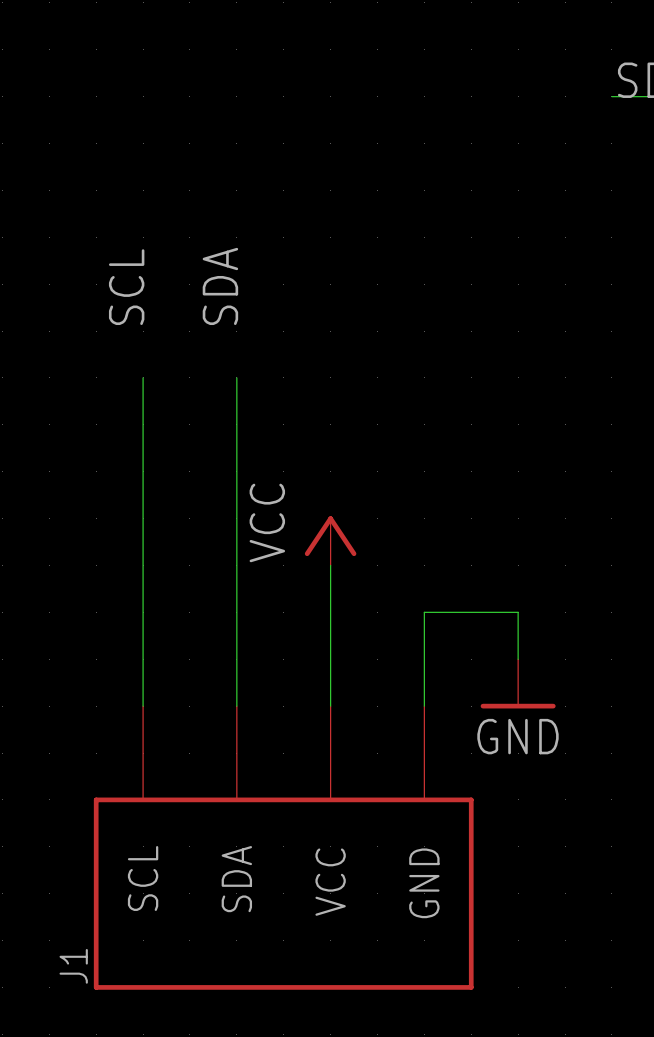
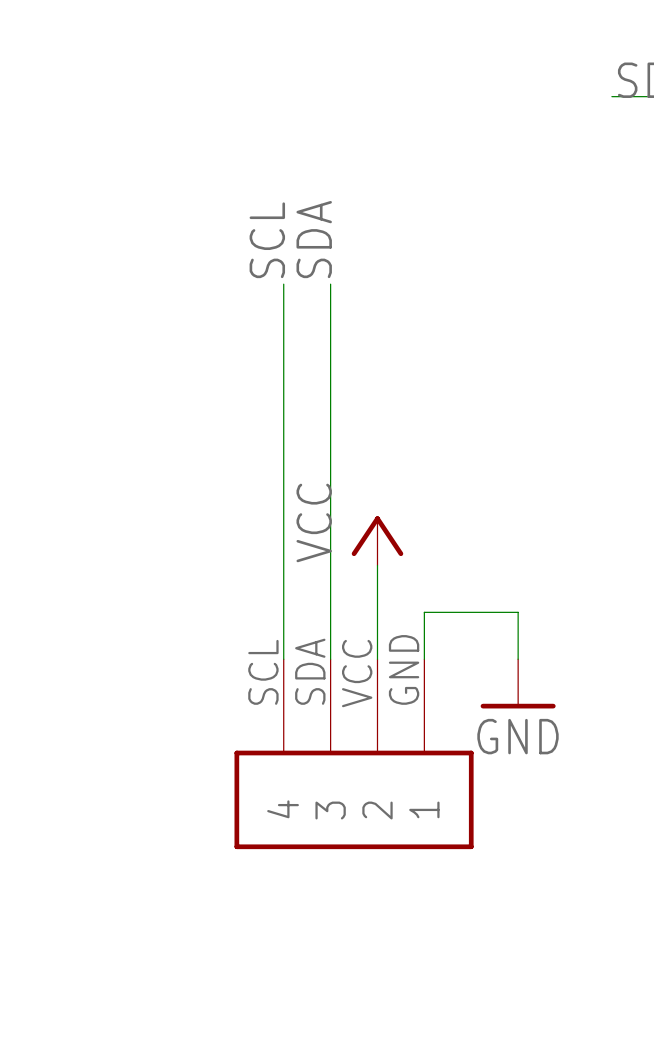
wire: none -> (283, 284) (283, 659)
wire: none -> (330, 284) (330, 565)
label position: SDA (220, 286) -> SDA (314, 239)
label position: SCL (126, 287) -> SCL (267, 240)
wire: (143, 377) (143, 706) -> none
wire: (236, 377) (236, 706) -> none
power symbol position: VCC (330, 540) -> VCC (377, 540)
wire: none -> (377, 565) (377, 659)
part: none -> (354, 754)
J1: (283, 847) -> none

